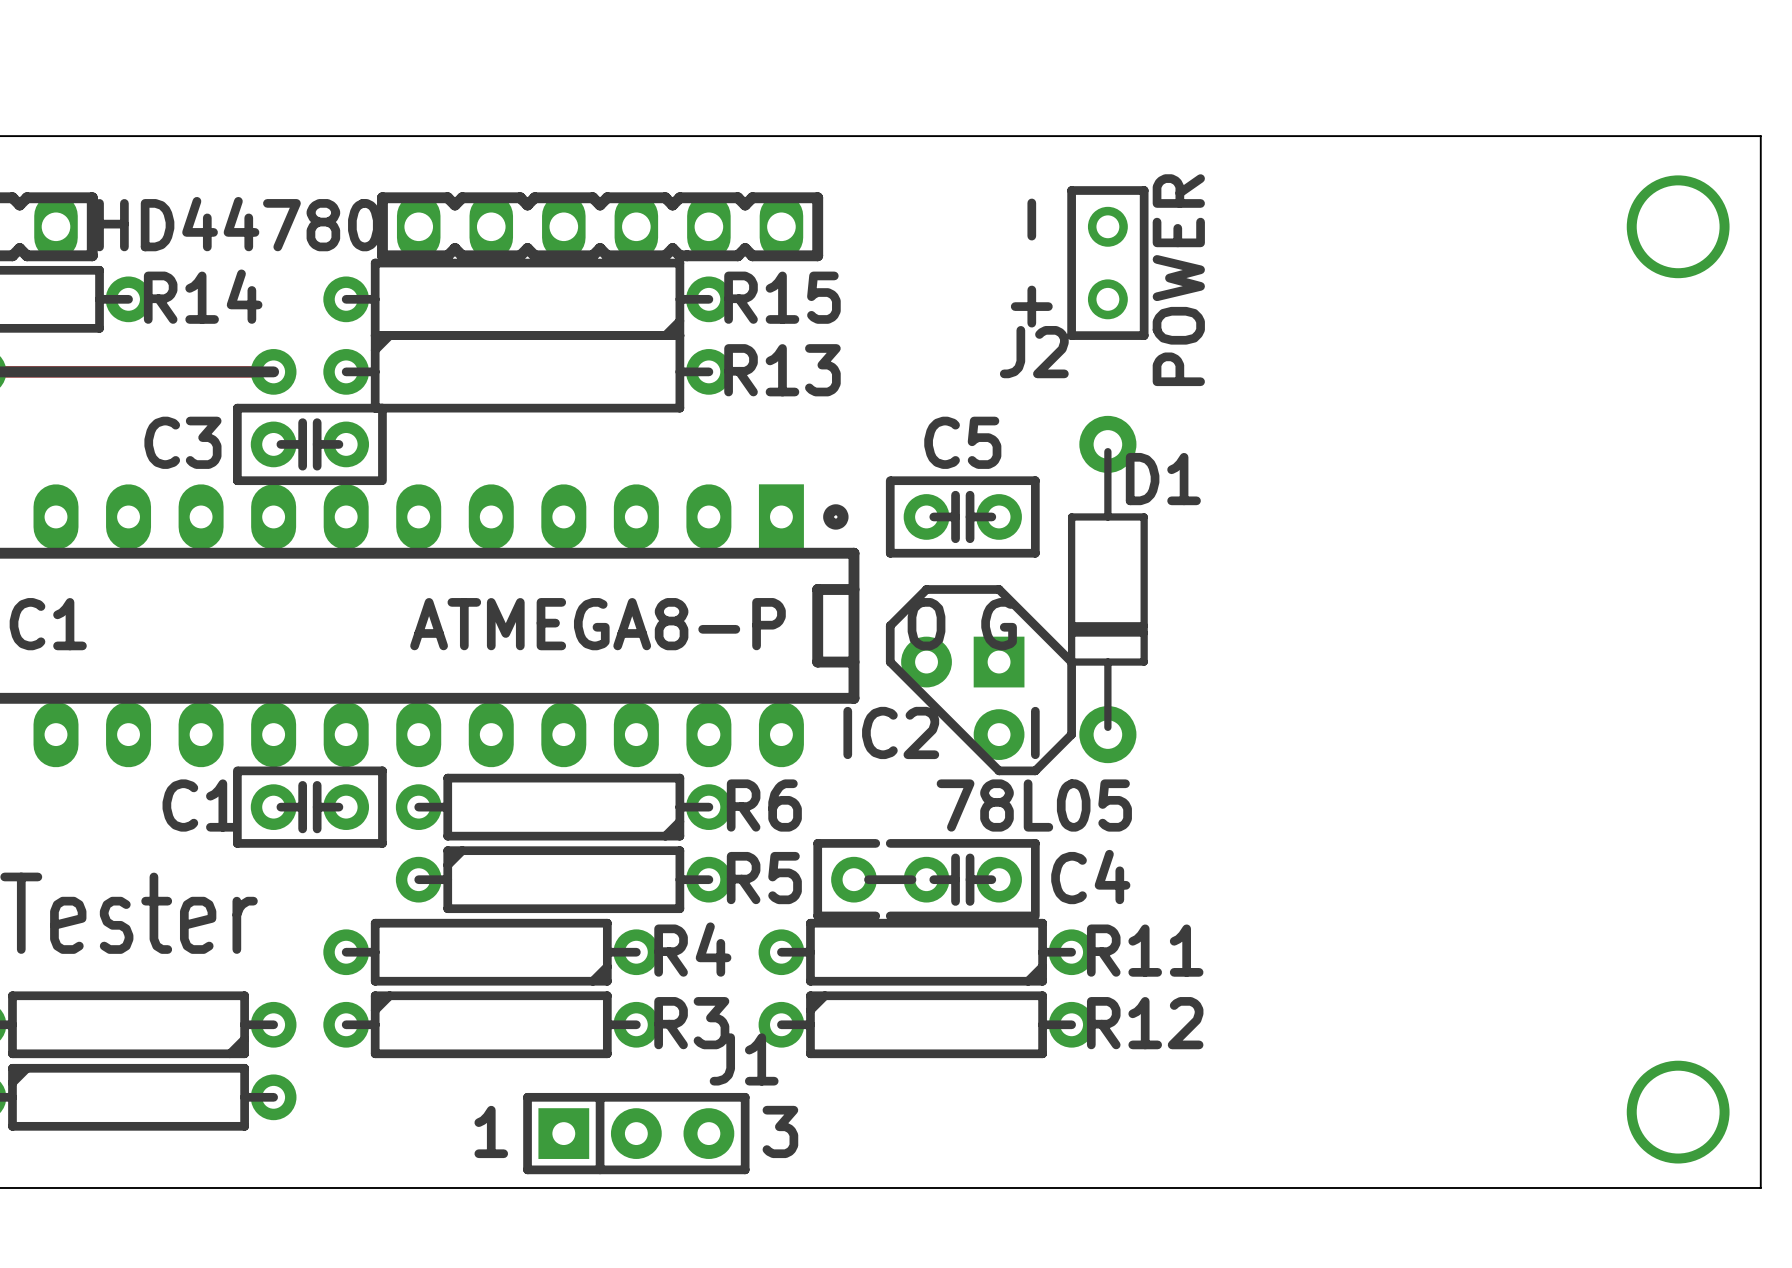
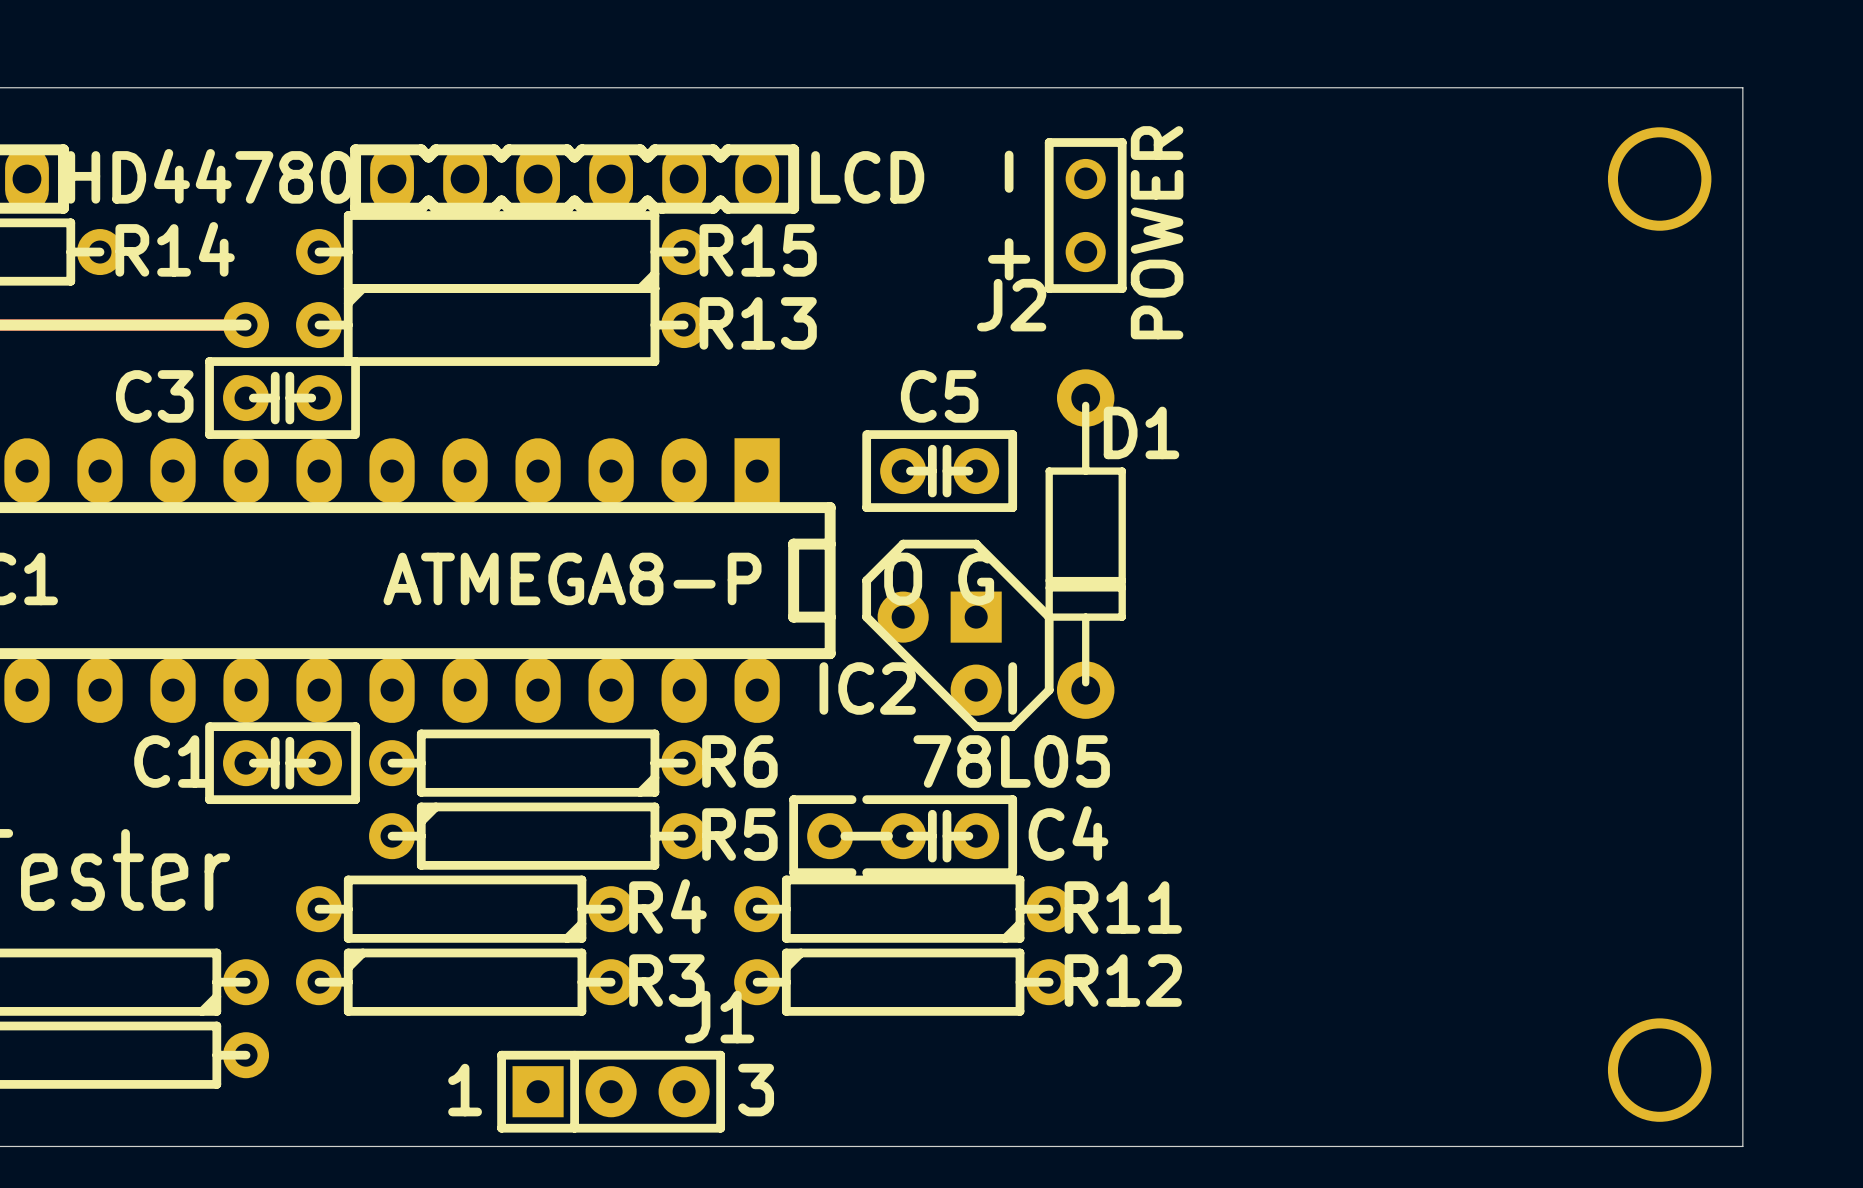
LCD name: none -> LCD (867, 177)
drawing: [823, 504, 849, 530] -> none

